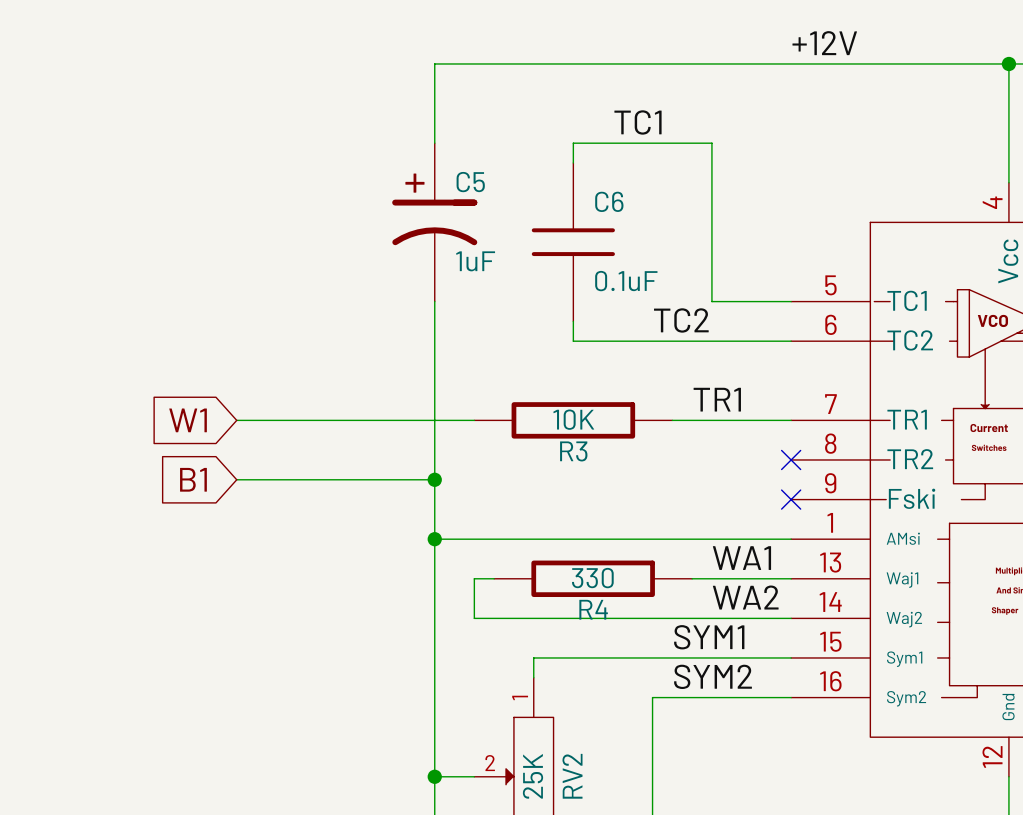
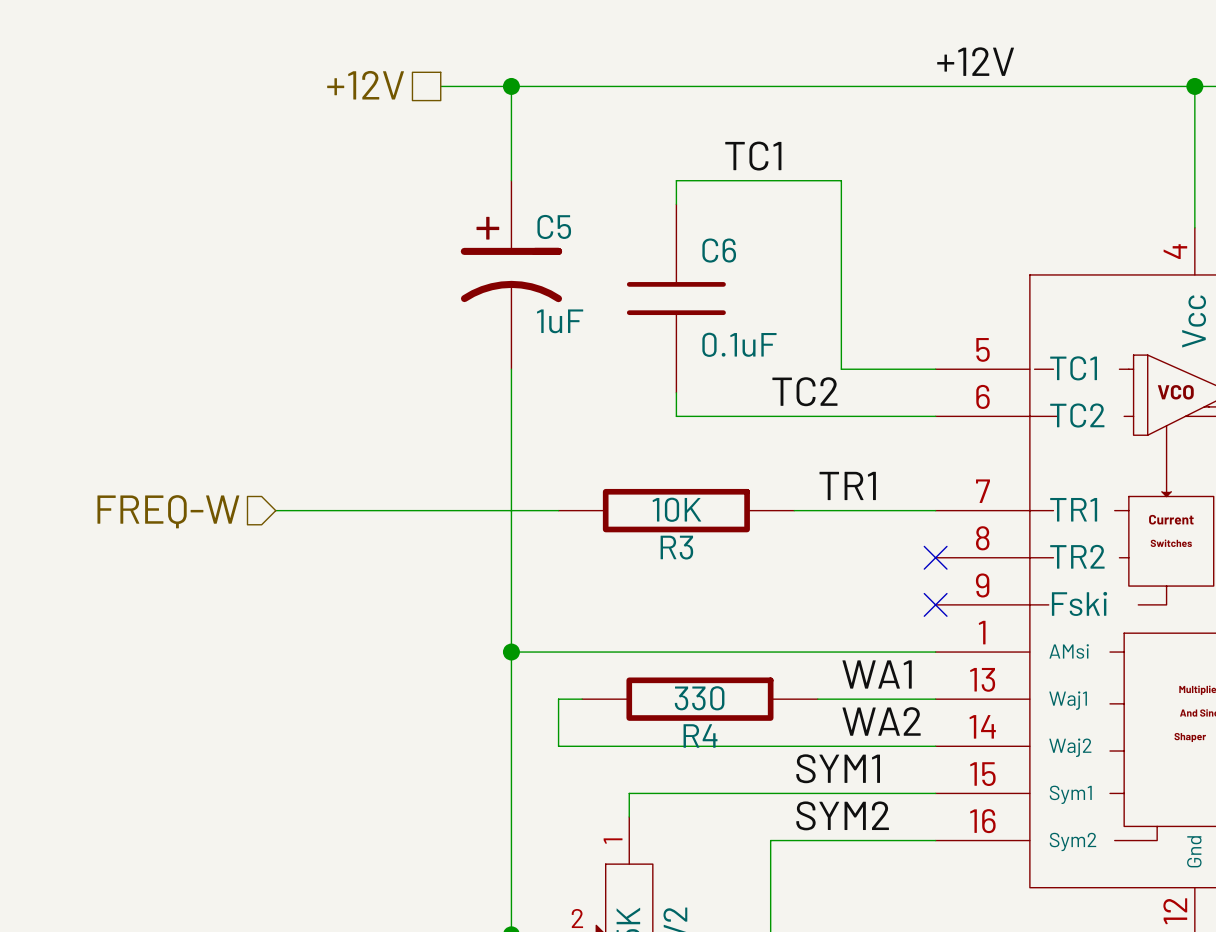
hierarchical label: none -> +12V (365, 85)
wire: none -> (440, 86) (511, 86)
junction: none -> (511, 86)
global label: W1 (188, 420) -> none
hierarchical label: none -> FREQ-W (168, 511)
global label: B1 (193, 479) -> none
wire: (236, 479) (434, 479) -> none
junction: (434, 479) -> none

